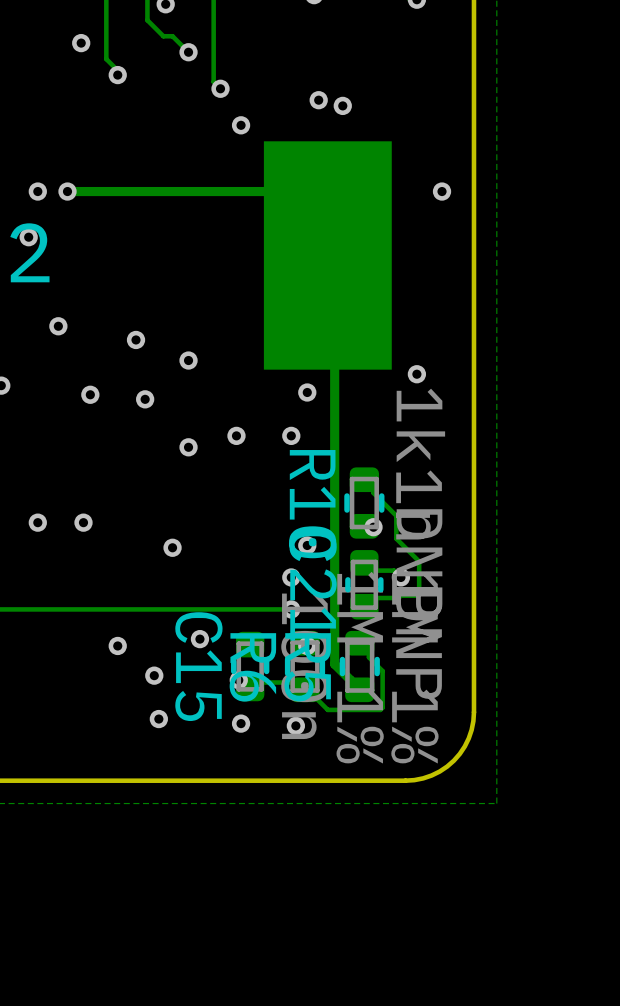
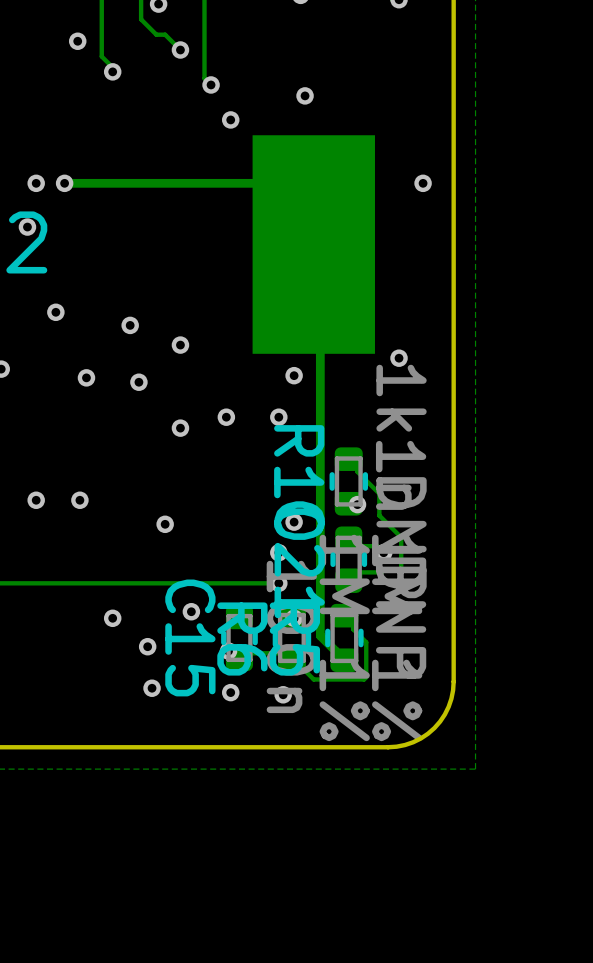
via: (342, 105) -> none

